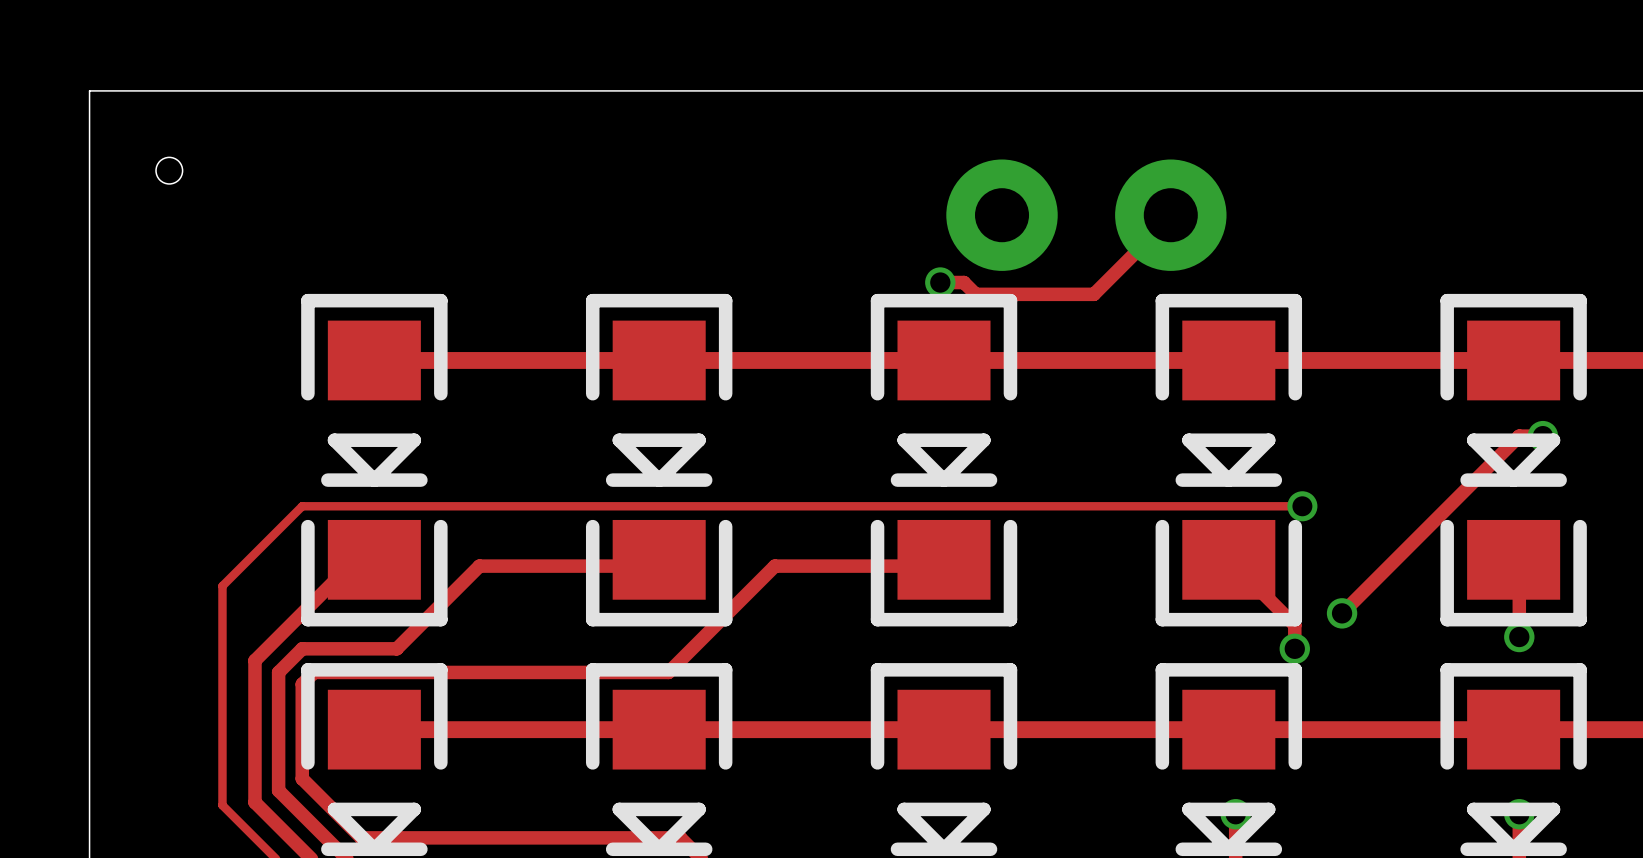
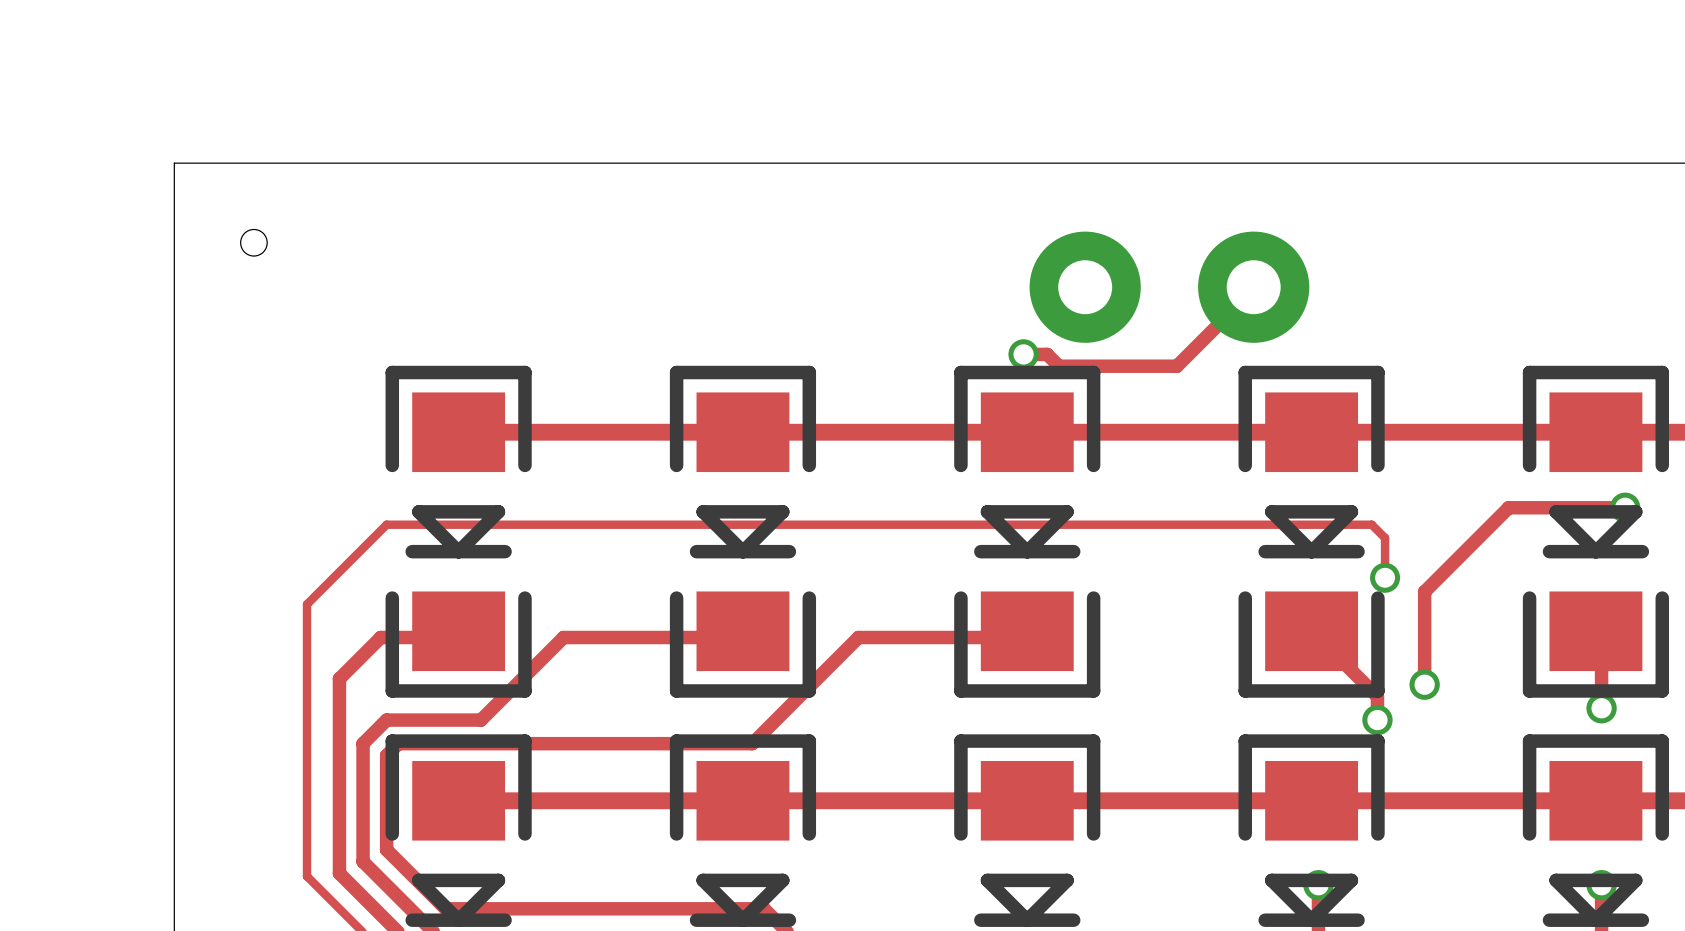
track: (1519, 436) (1342, 613) -> (1601, 507) (1508, 507) (1424, 591) (1424, 684)
track: (1302, 506) (302, 506) (222, 586) -> (1385, 577) (1385, 537) (1371, 524) (386, 524) (307, 604) (307, 657)
track: (349, 566) (254, 660) -> (433, 637) (380, 637) (339, 678) (339, 731)

